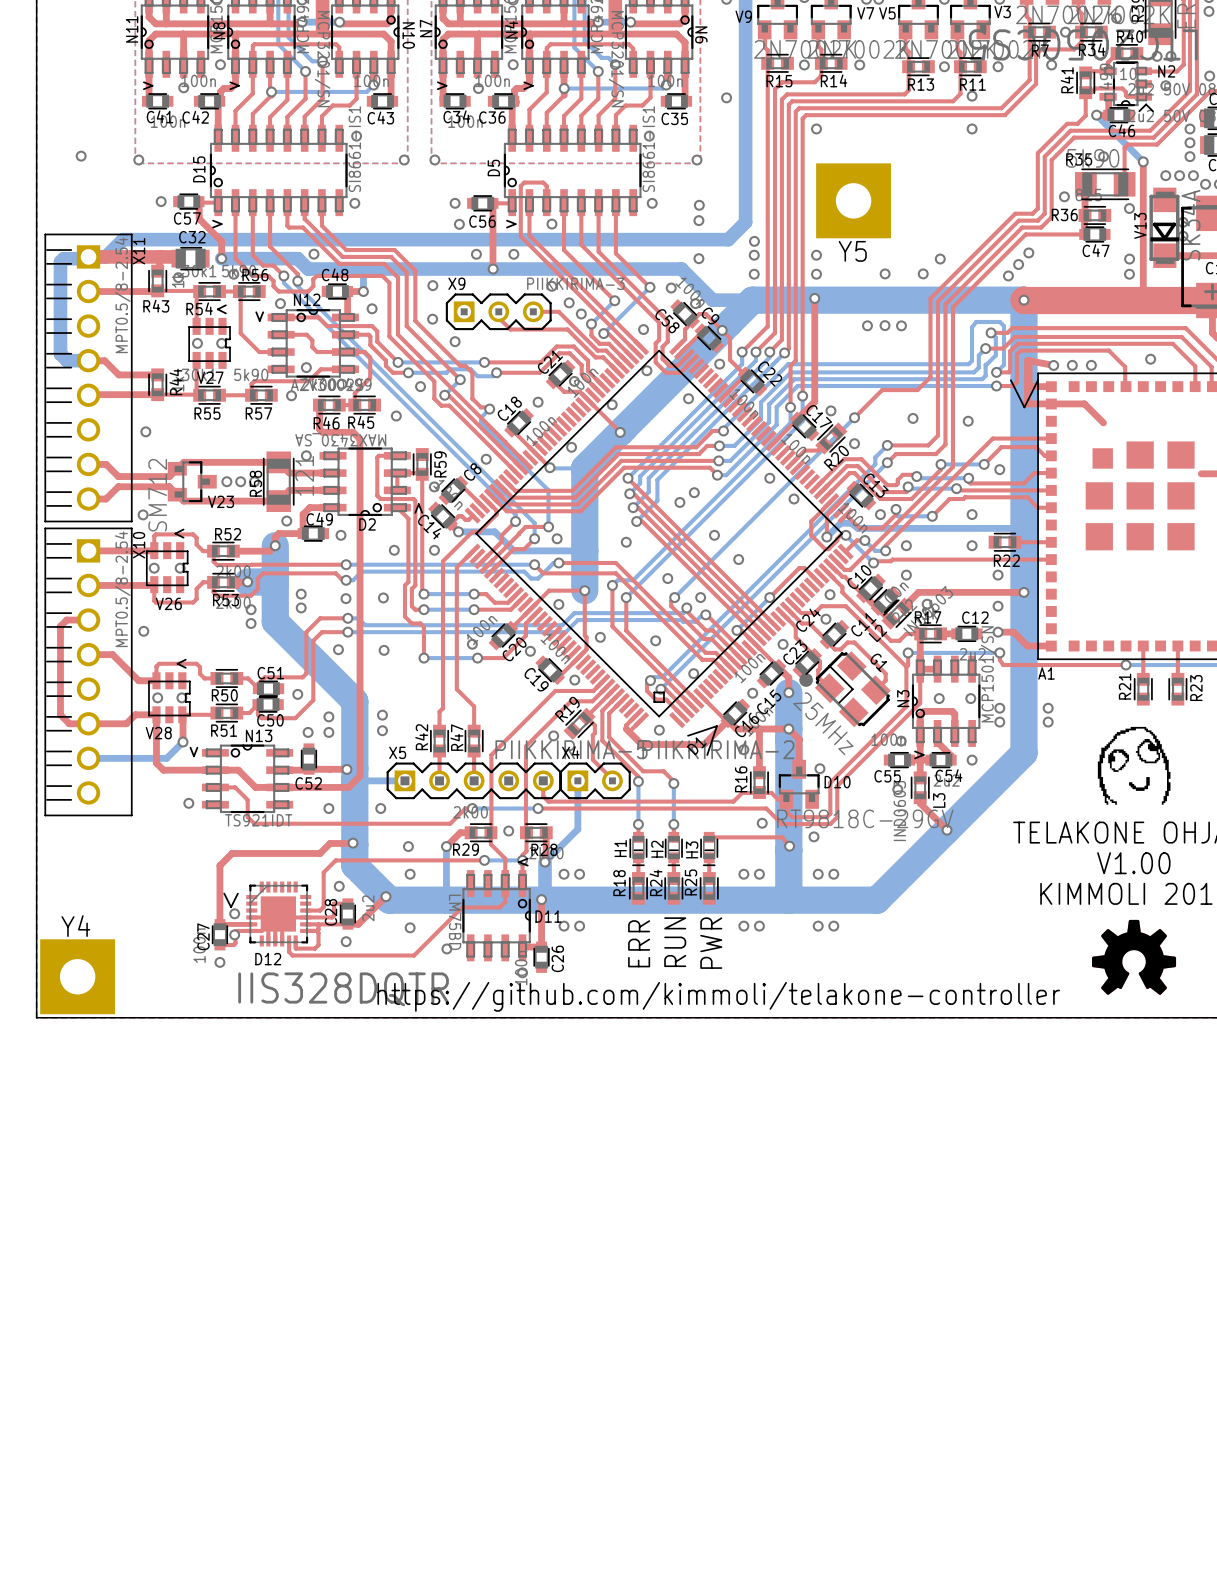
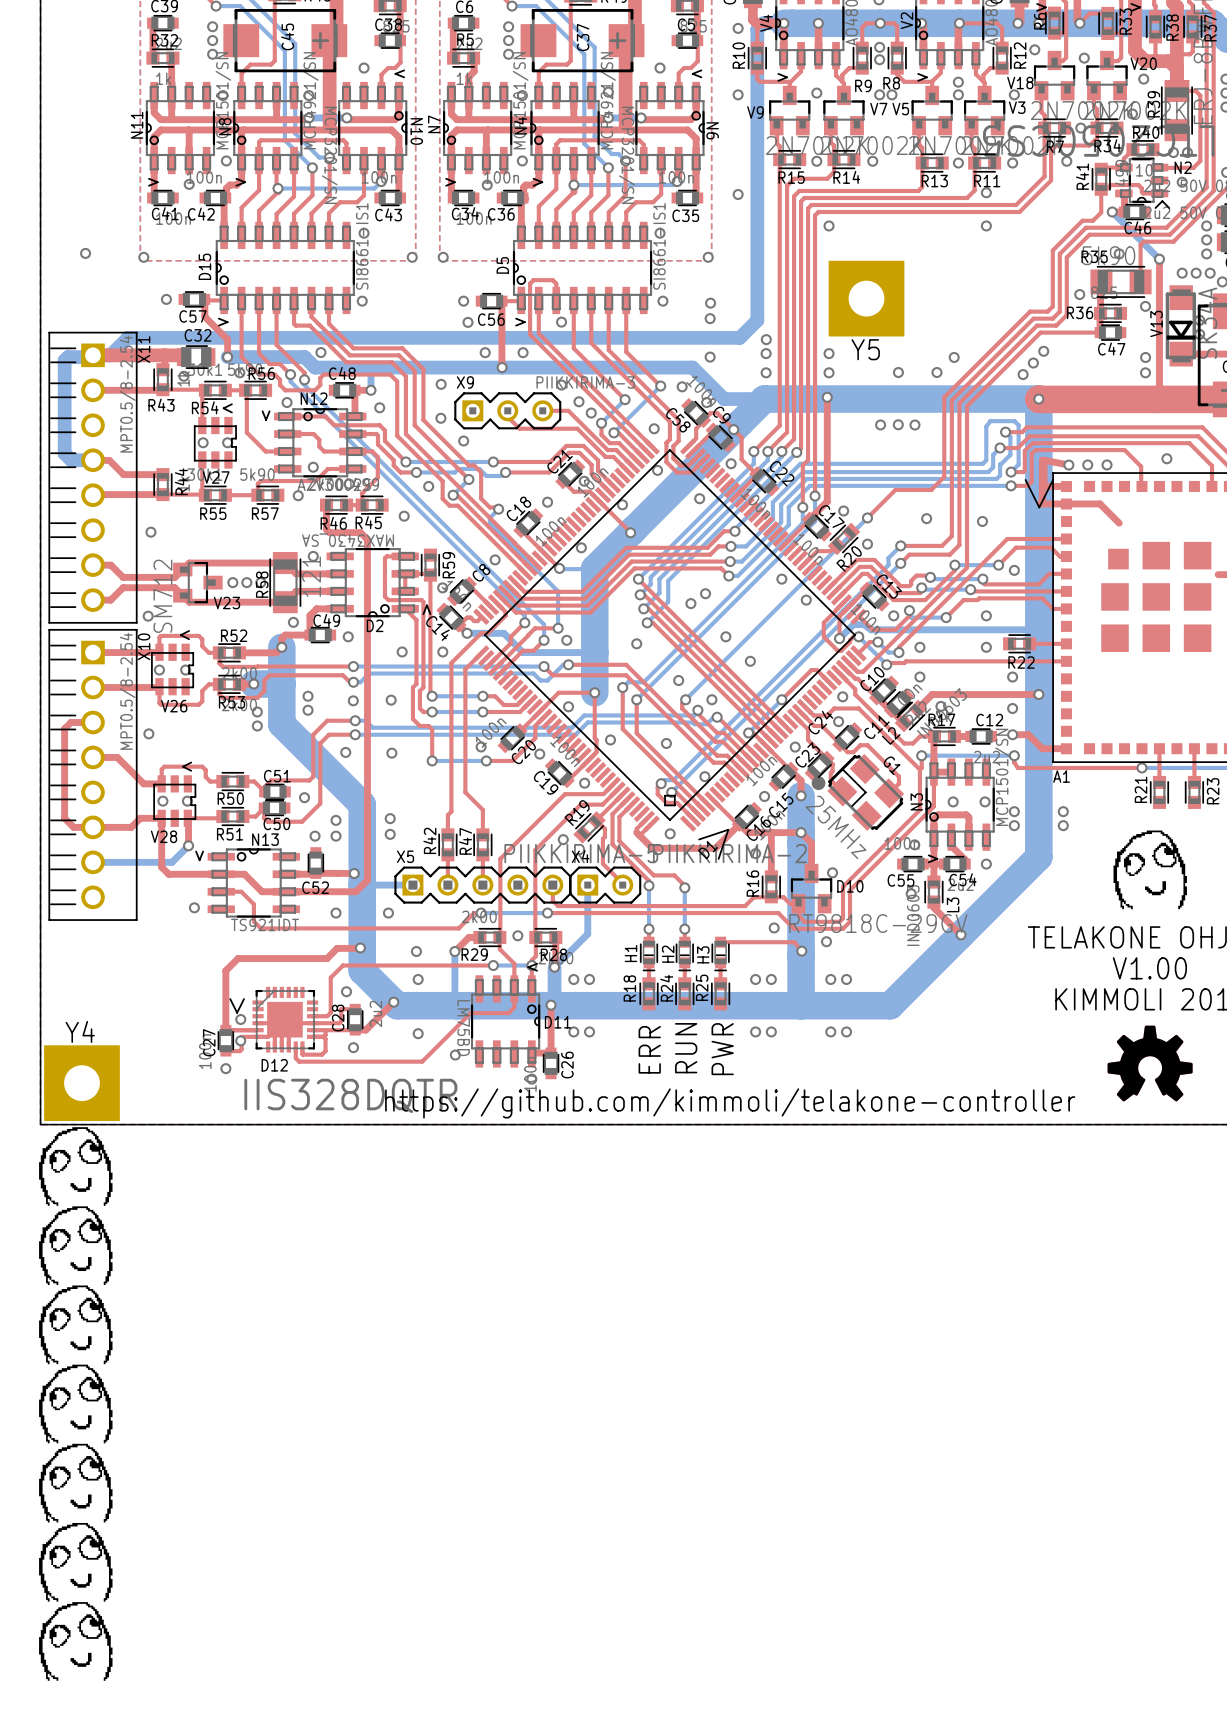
drawing: none -> [39, 1127, 113, 1681]

